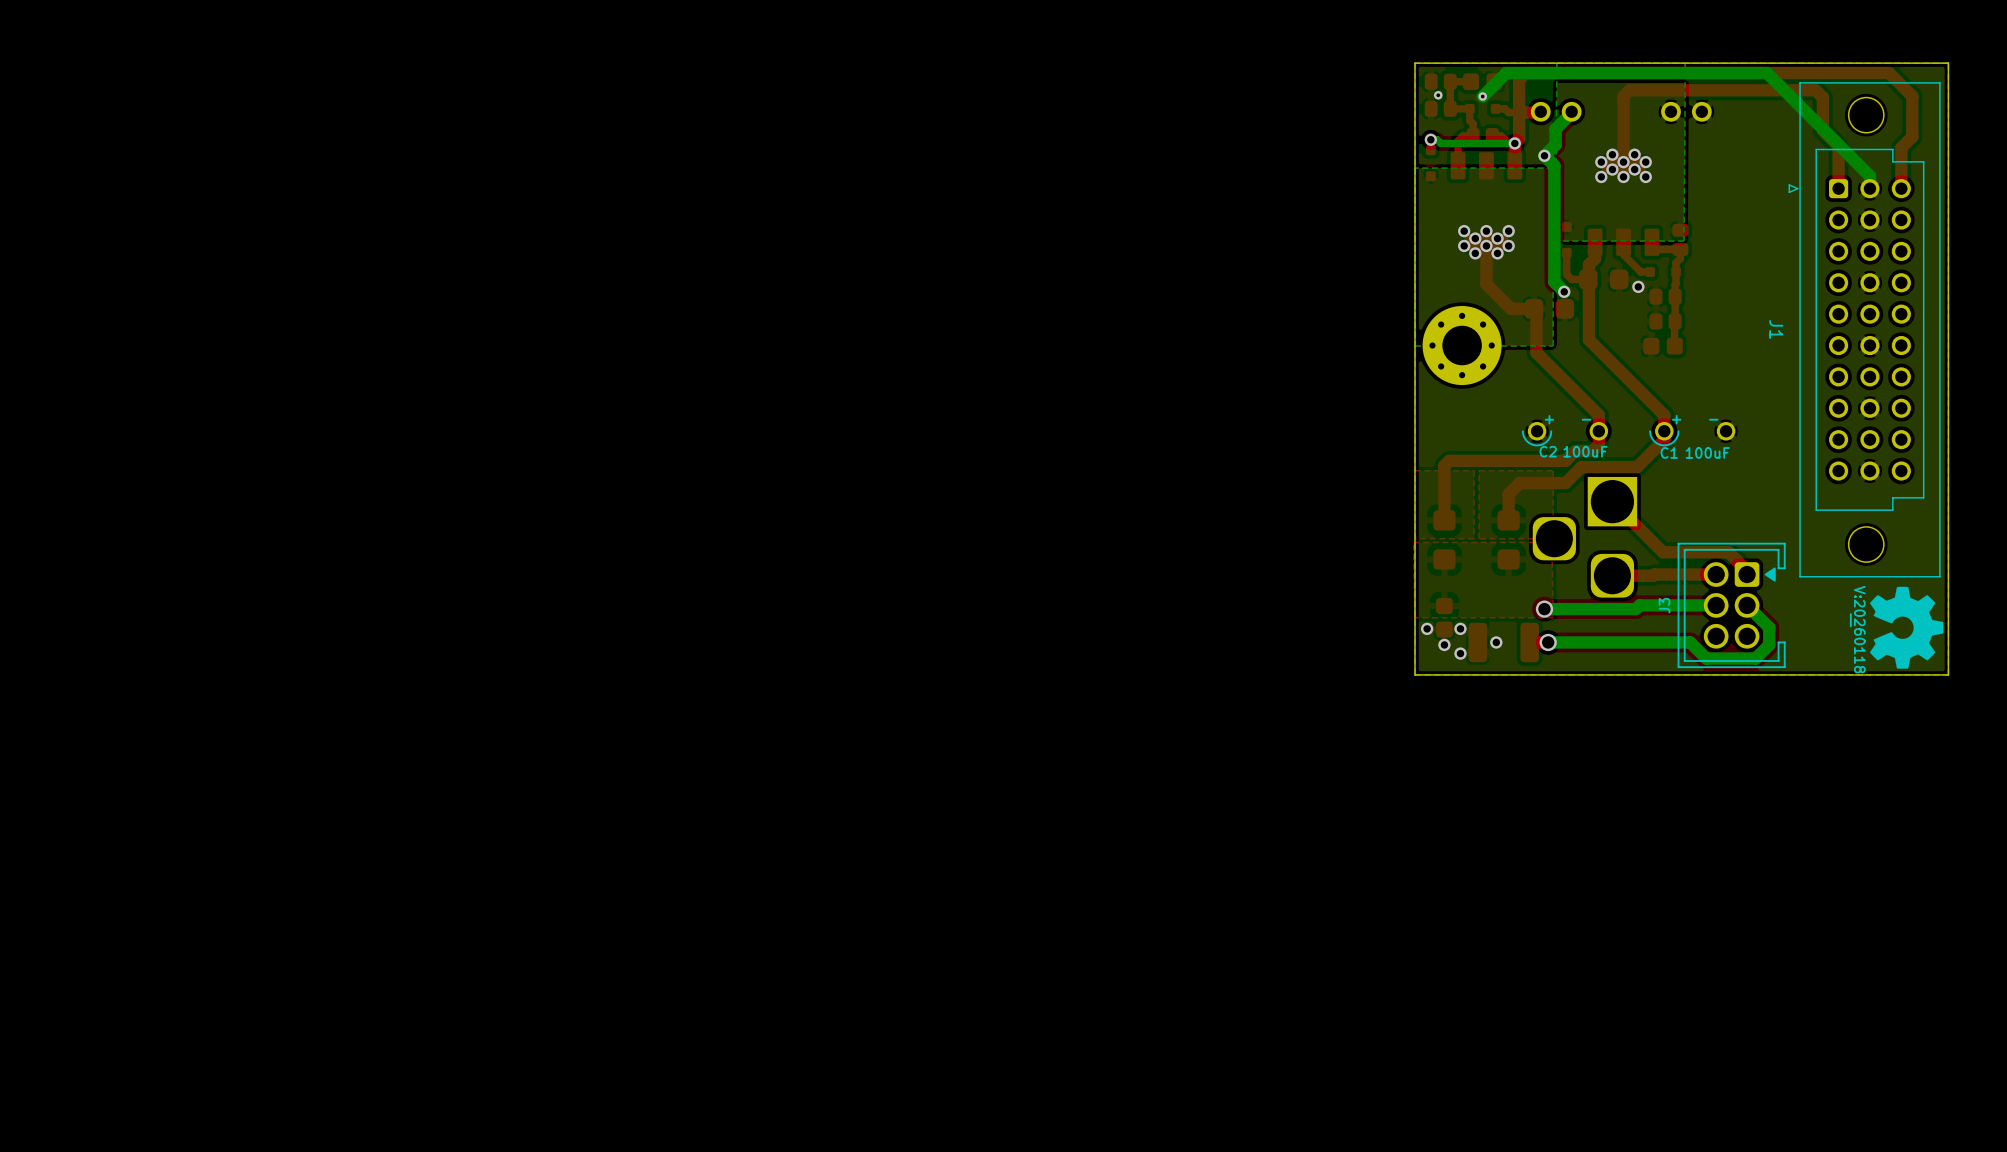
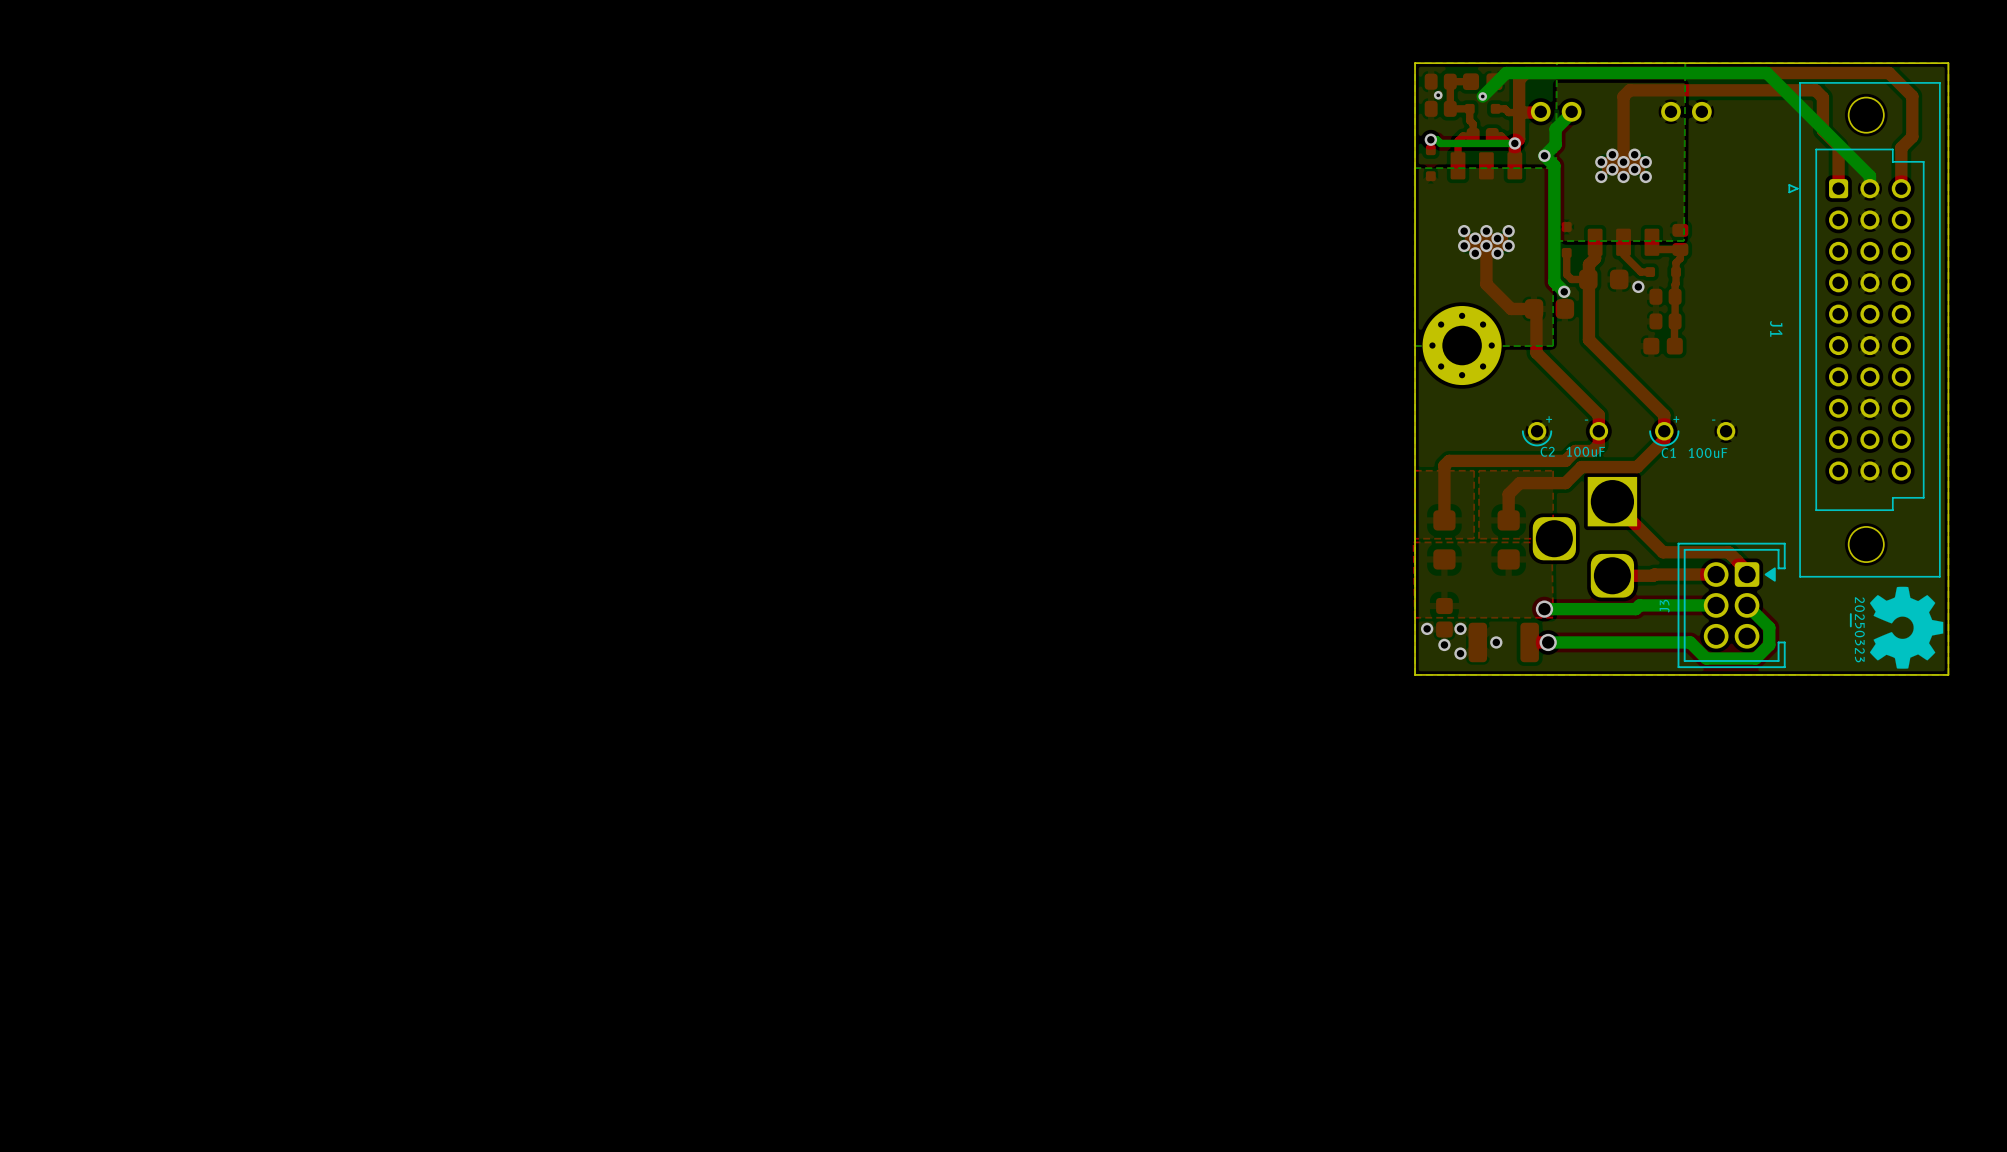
drawing shape: [1849, 585, 1866, 674] -> [1849, 597, 1865, 663]

